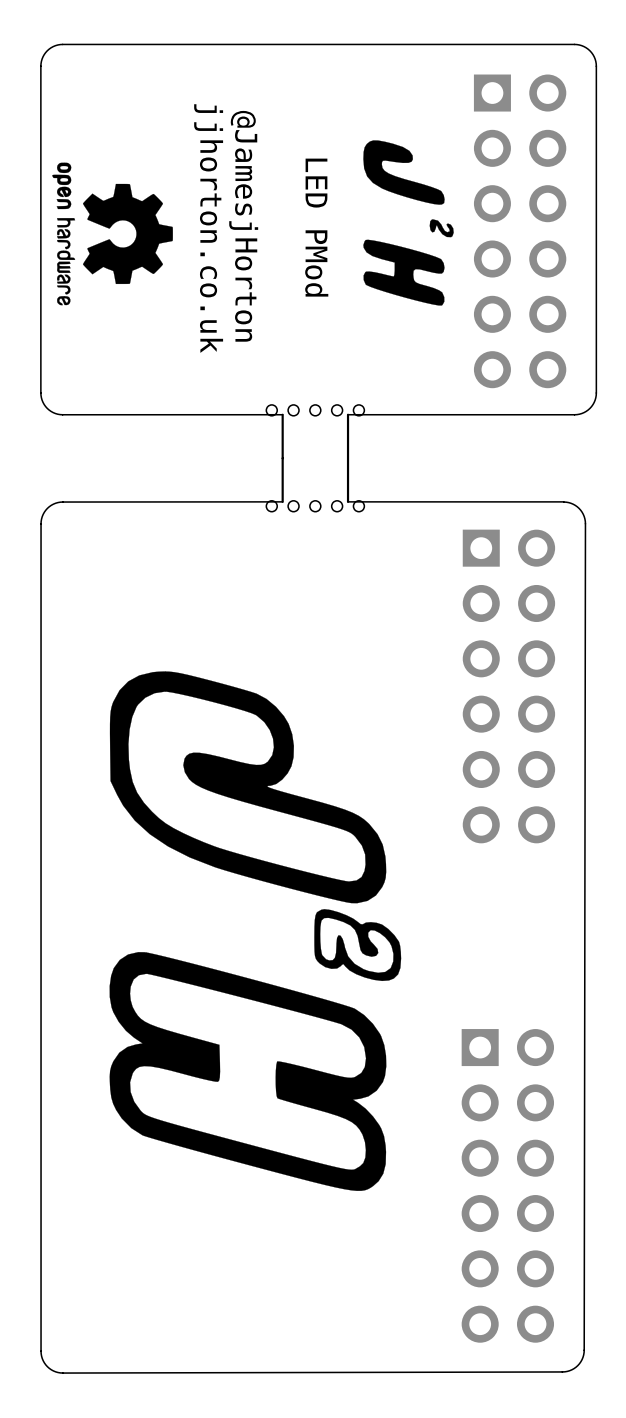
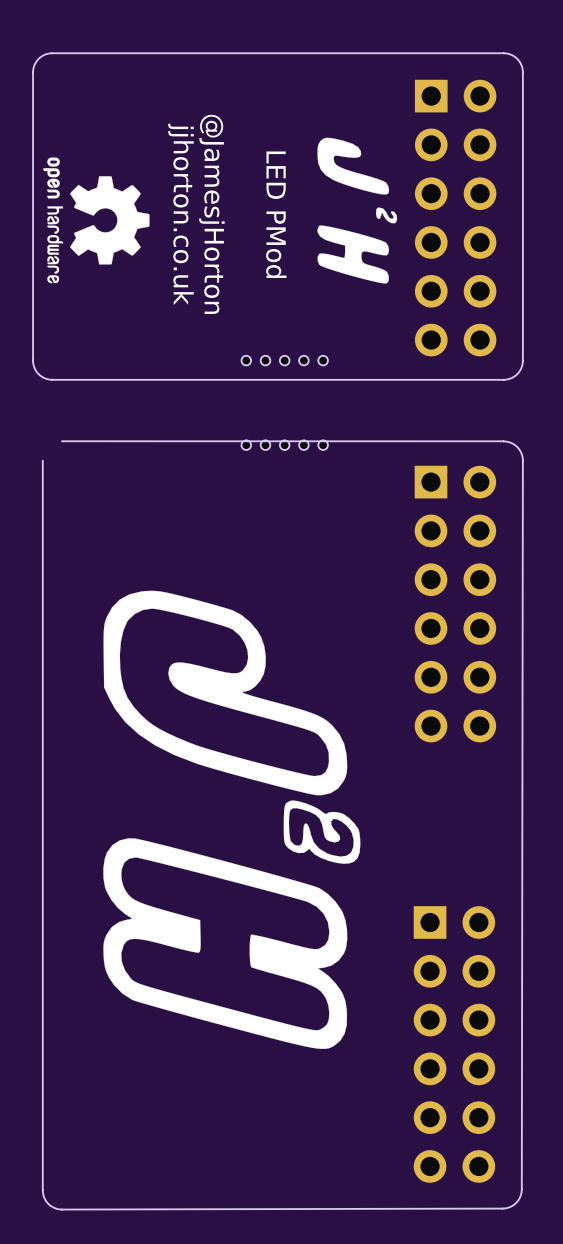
board edge: none -> (503, 53) (52, 53) (42, 56) (34, 64) (33, 72) (33, 360) (35, 370) (42, 376) (52, 379) (503, 379) (513, 376) (520, 368) (522, 360) (522, 72) (517, 58) (503, 53)
drawing position: (408, 222) -> (357, 210)
text position: @JamesjHorton (243, 226) -> @JamesjHorton (211, 214)
text position: LED PMod (316, 227) -> LED PMod (276, 214)
text position: jjhorton.co.uk (208, 228) -> jjhorton.co.uk (180, 214)
part position: (520, 231) -> (455, 218)
drawing position: (112, 233) -> (96, 220)
board edge: (348, 501) (348, 414) (574, 414) (586, 411) (594, 402) (596, 392) (596, 66) (593, 54) (584, 46) (574, 44) (62, 44) (49, 49) (43, 56) (40, 66) (40, 392) (43, 402) (51, 411) (62, 414) (282, 414) (282, 501) (60, 502) (47, 508) (43, 514) (41, 523) -> (313, 441) (62, 441)

